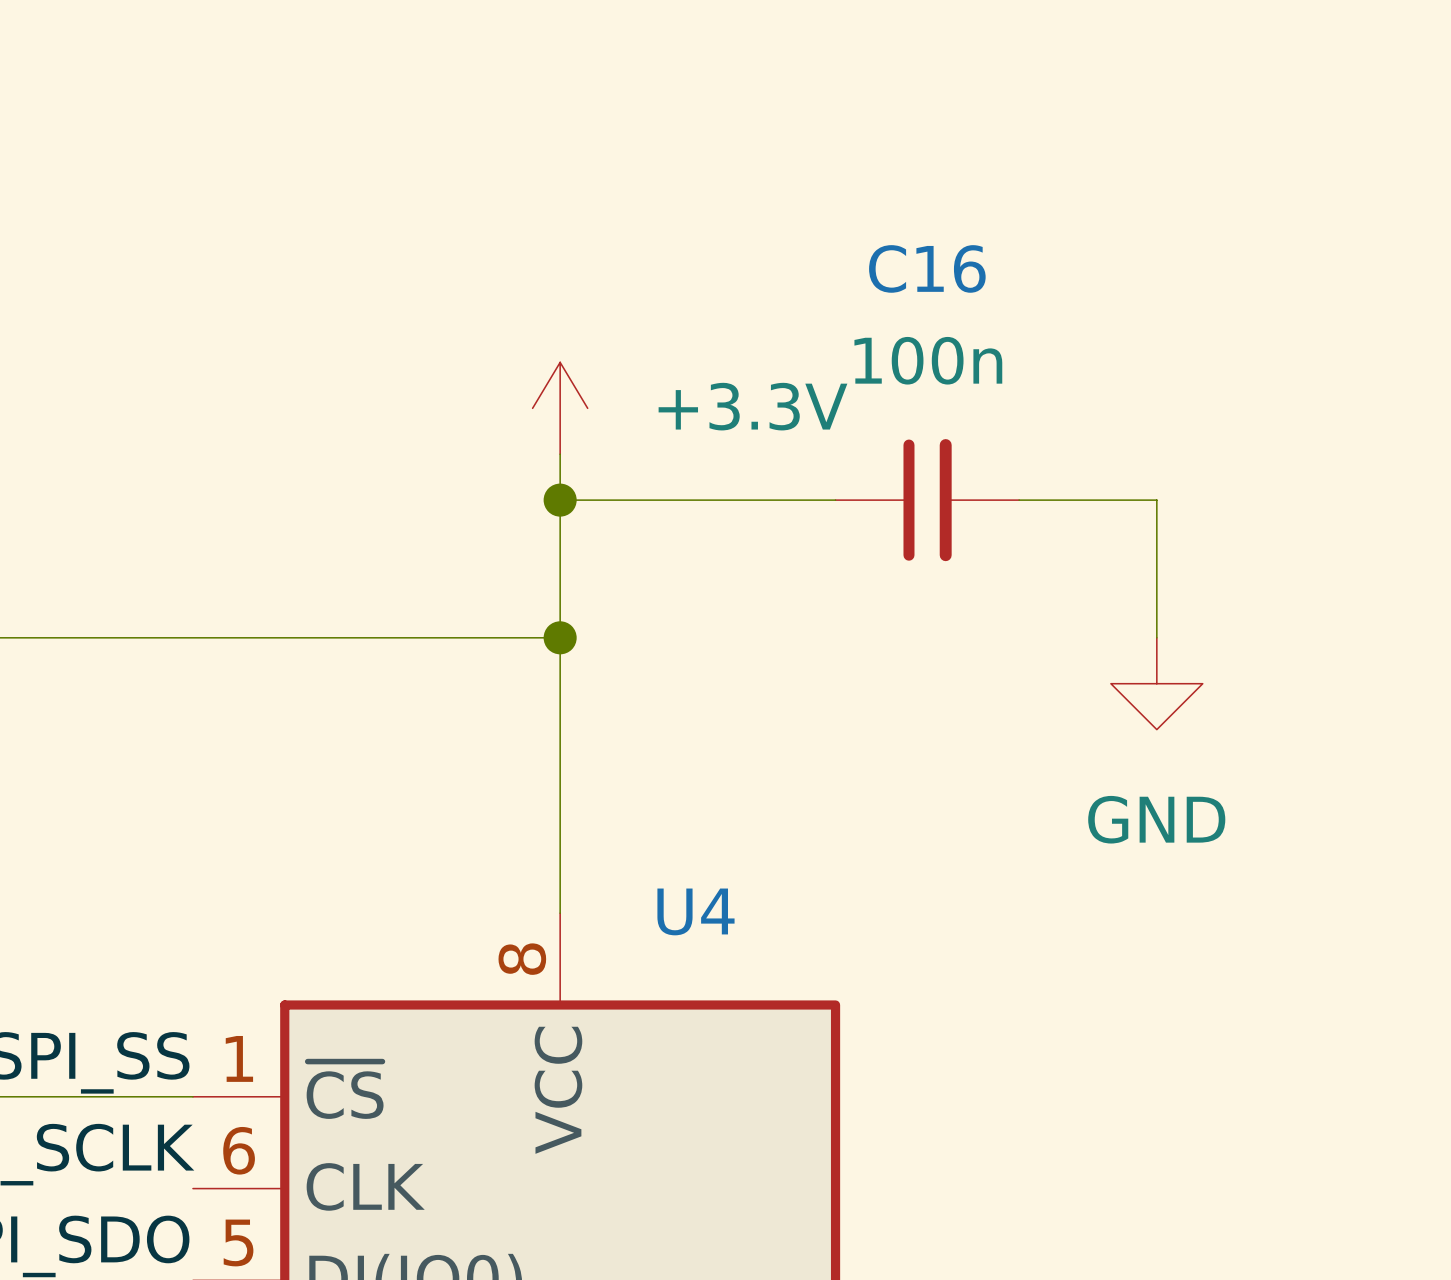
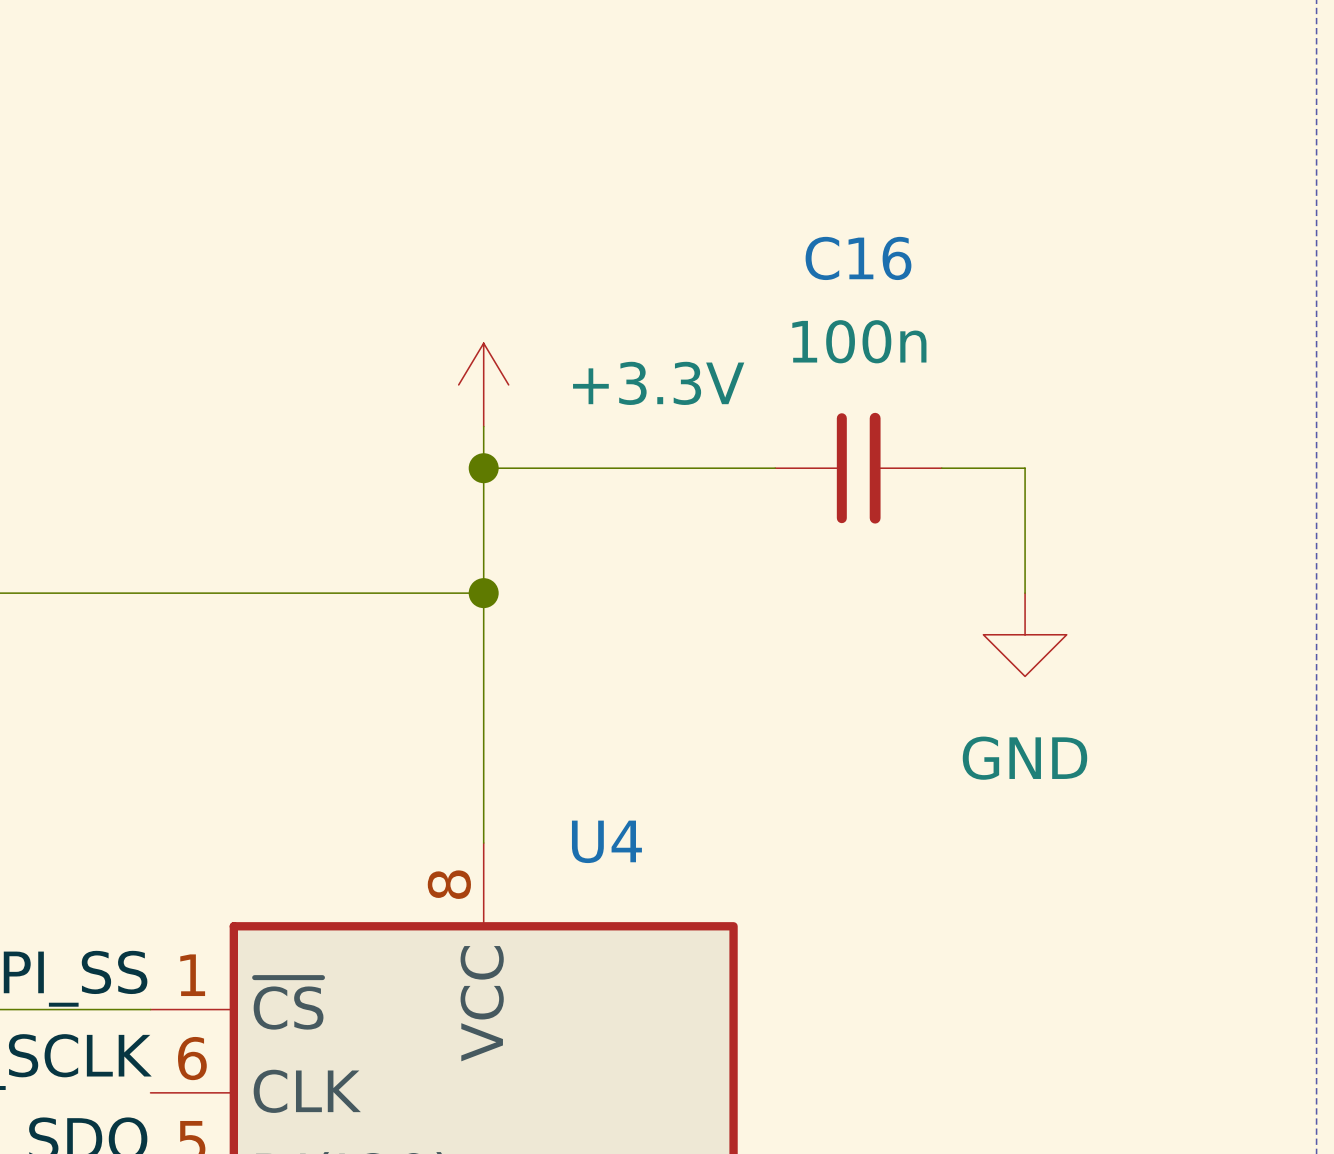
C16 position: (927, 500) -> (858, 468)

